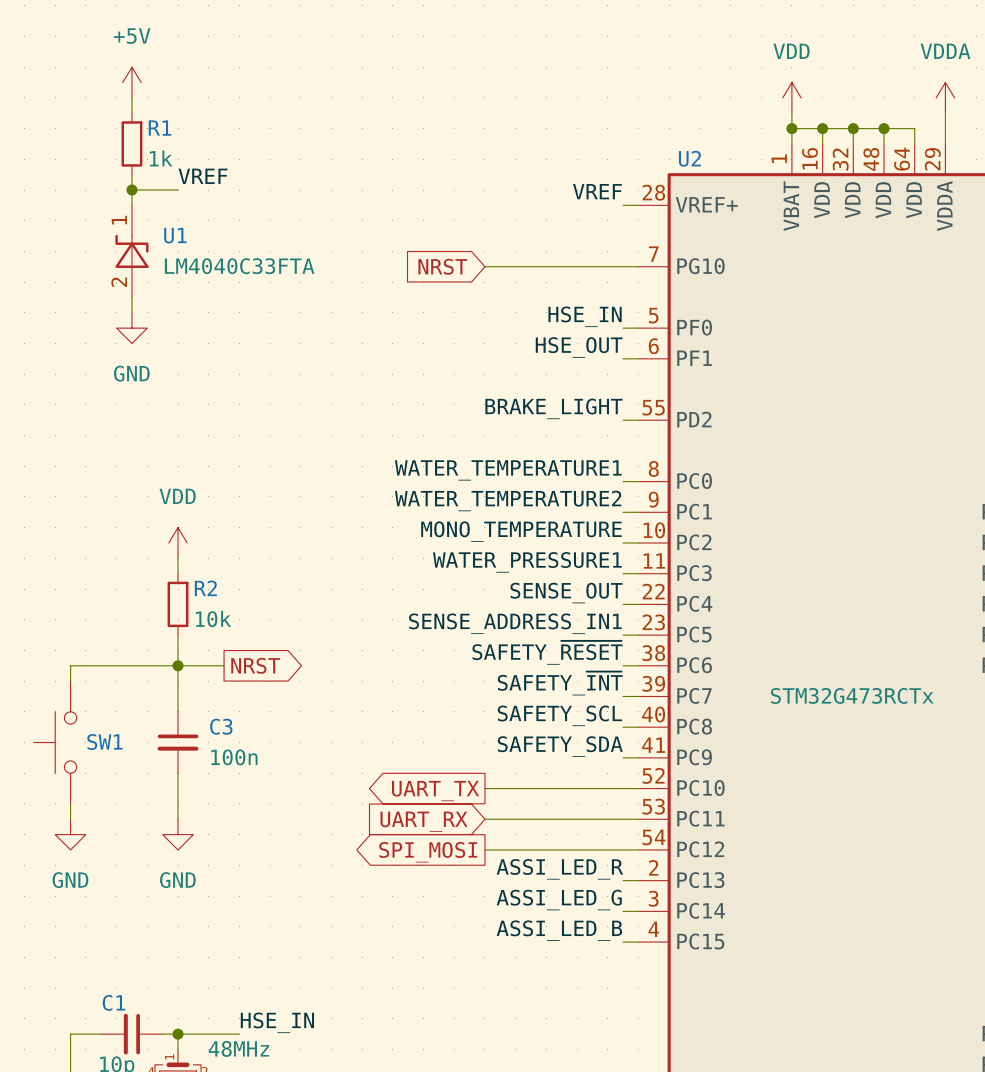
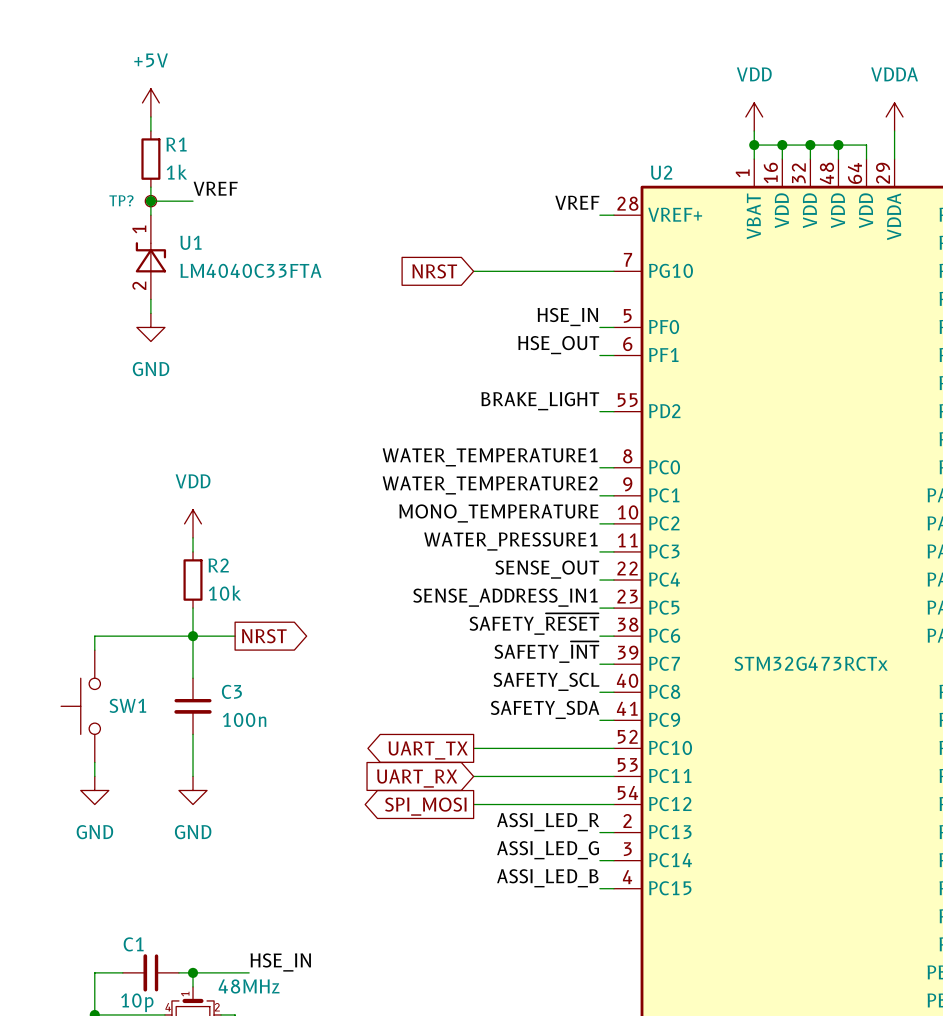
TP?: none -> (150, 201)

